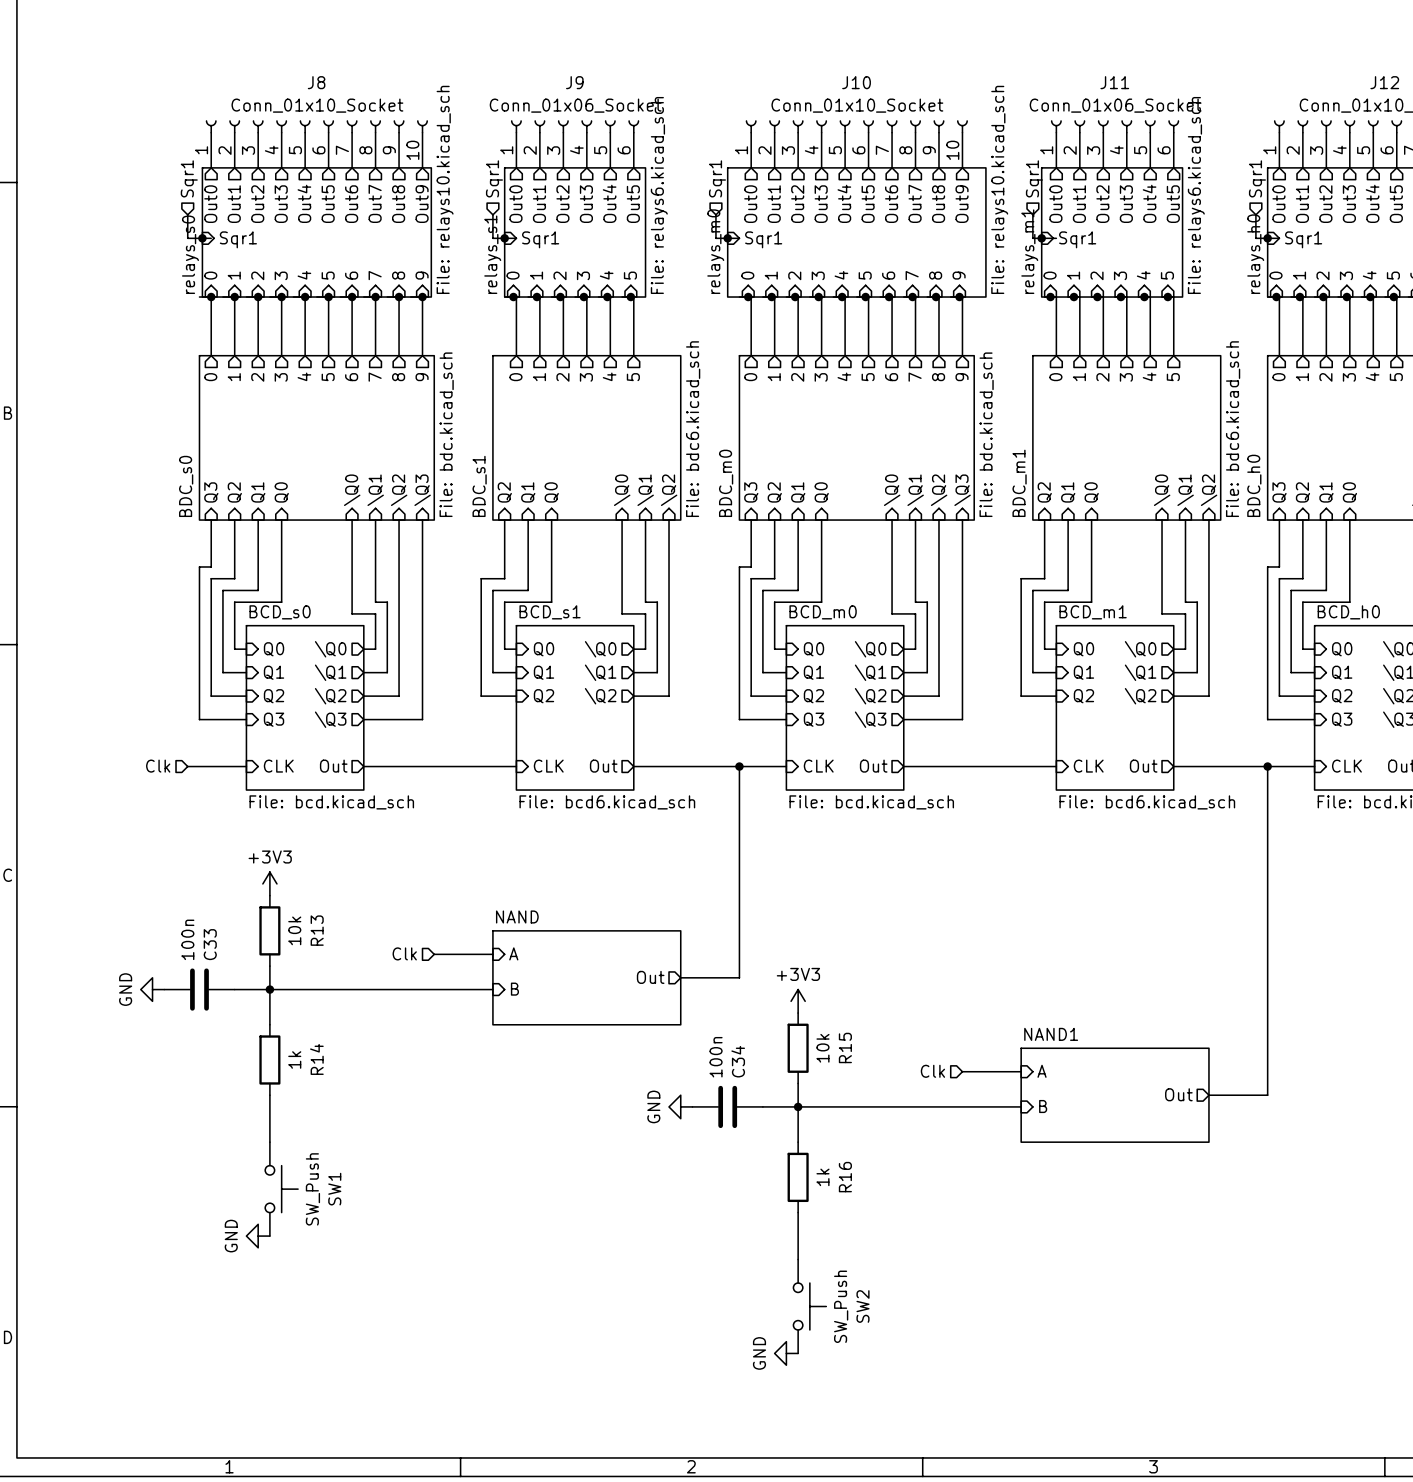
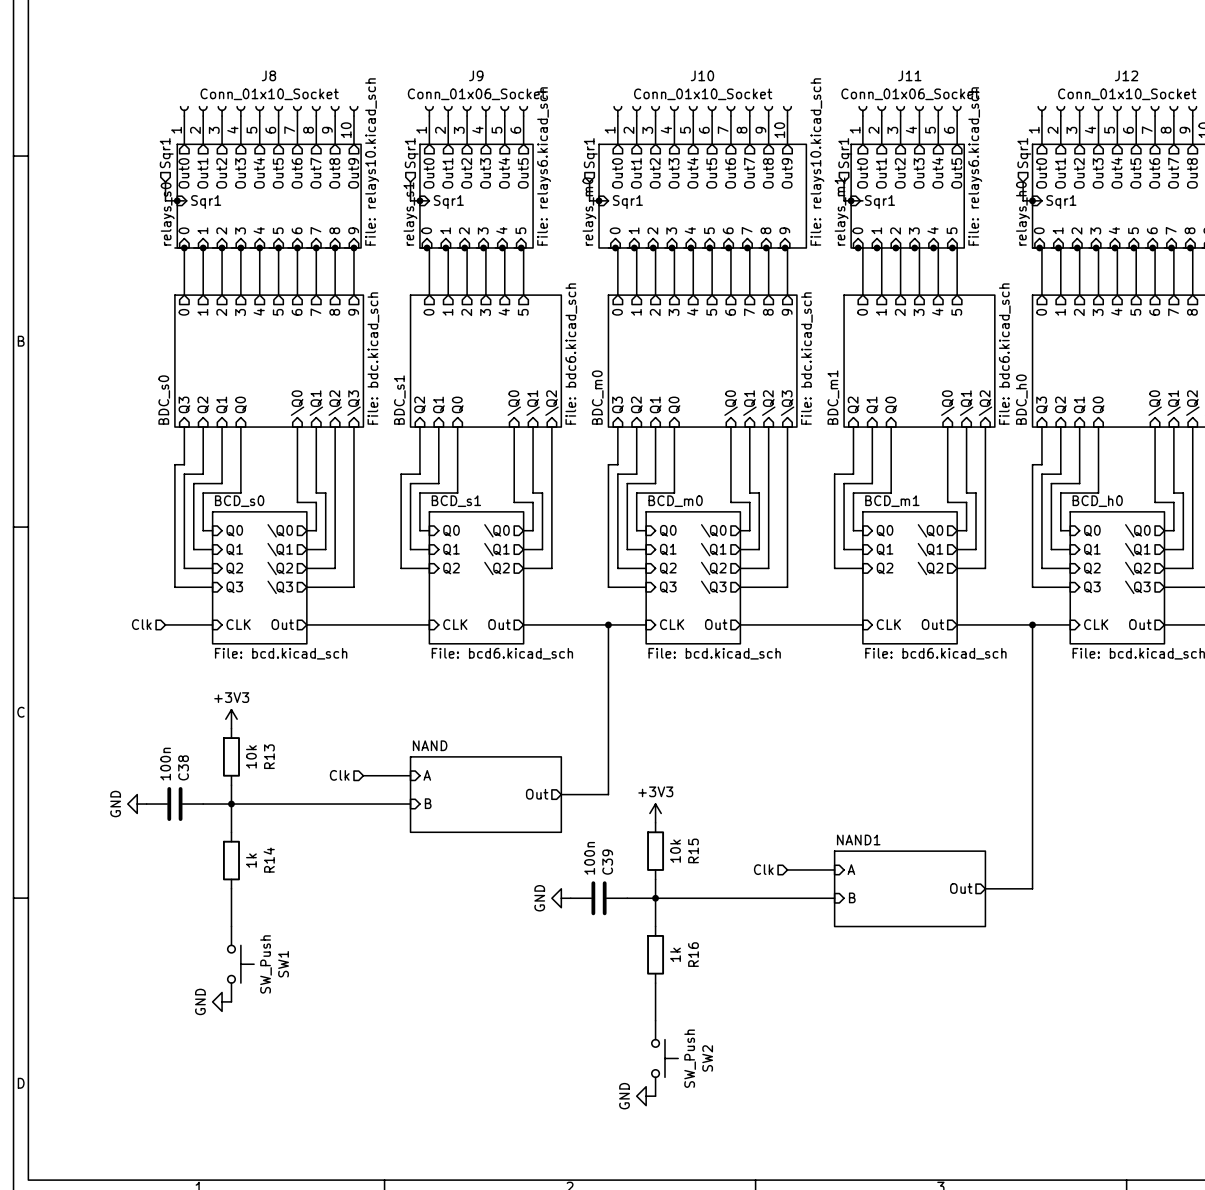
C33 name: C33 (210, 944) -> C38 (183, 767)
C34 name: C34 (738, 1061) -> C39 (607, 862)

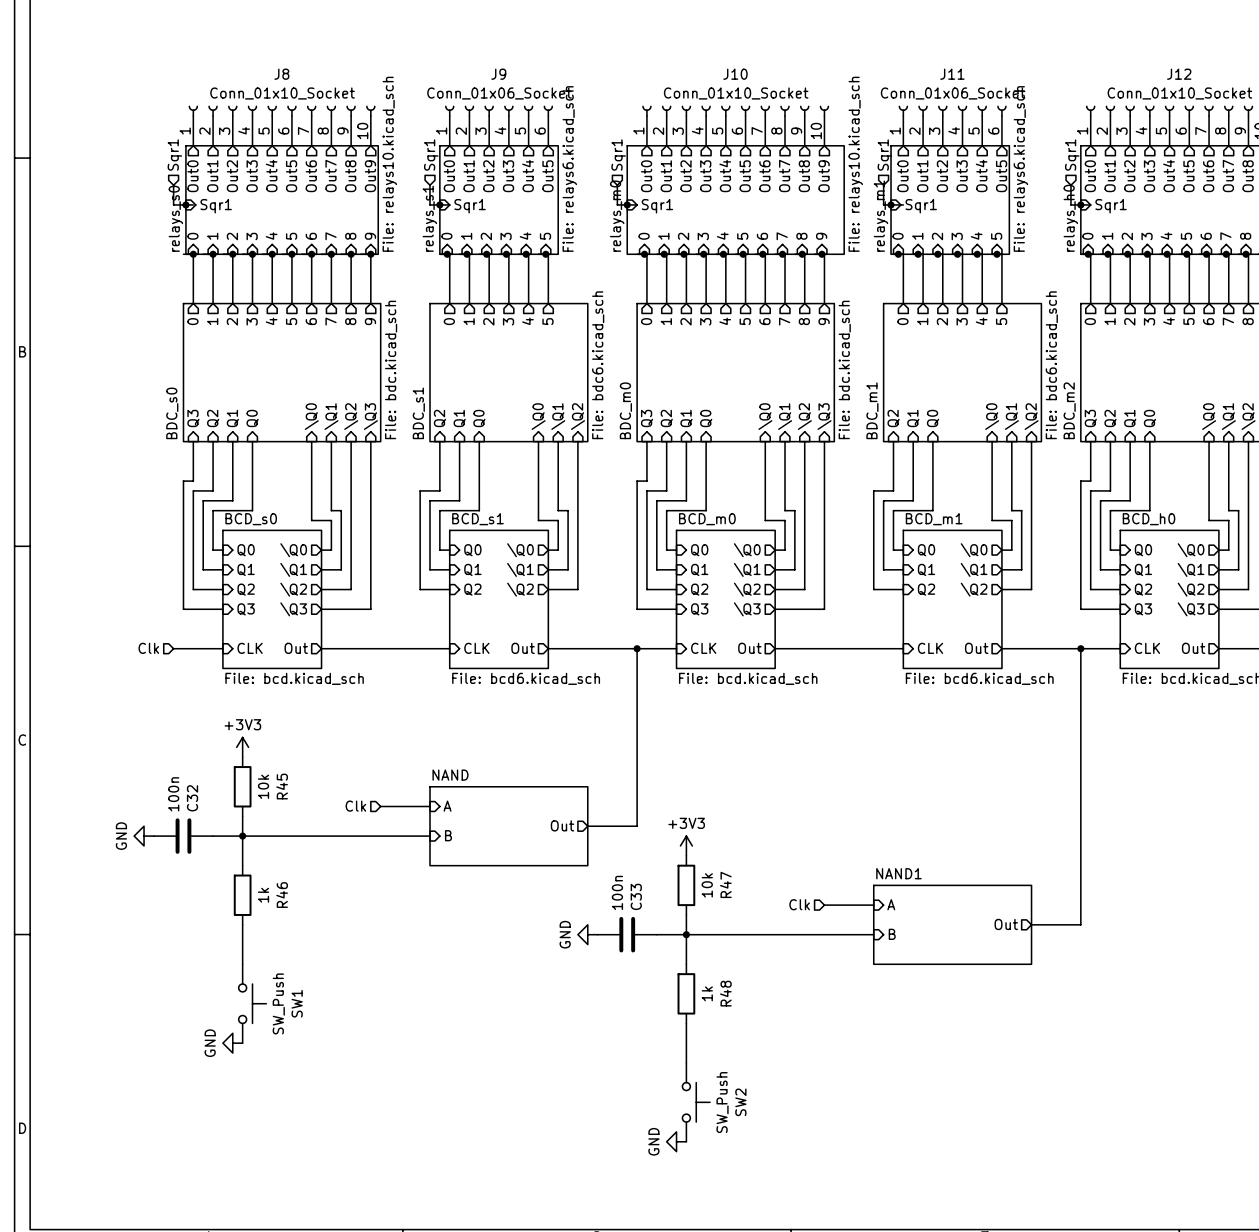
sheet BDC_h0 name: BDC_h0 (1021, 399) -> BDC_m2 (1069, 410)
R13 name: R13 (269, 756) -> R45 (282, 786)
C38 name: C38 (183, 767) -> C32 (192, 798)
R15 name: R15 (693, 850) -> R47 (725, 884)
R14 name: R14 (269, 860) -> R46 (282, 895)
C39 name: C39 (607, 862) -> C33 (636, 896)
R16 name: R16 (693, 954) -> R48 (725, 993)

